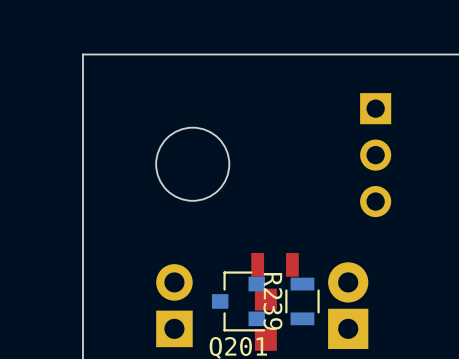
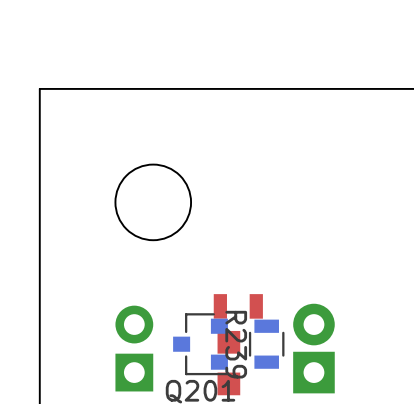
part: (375, 155) -> none

